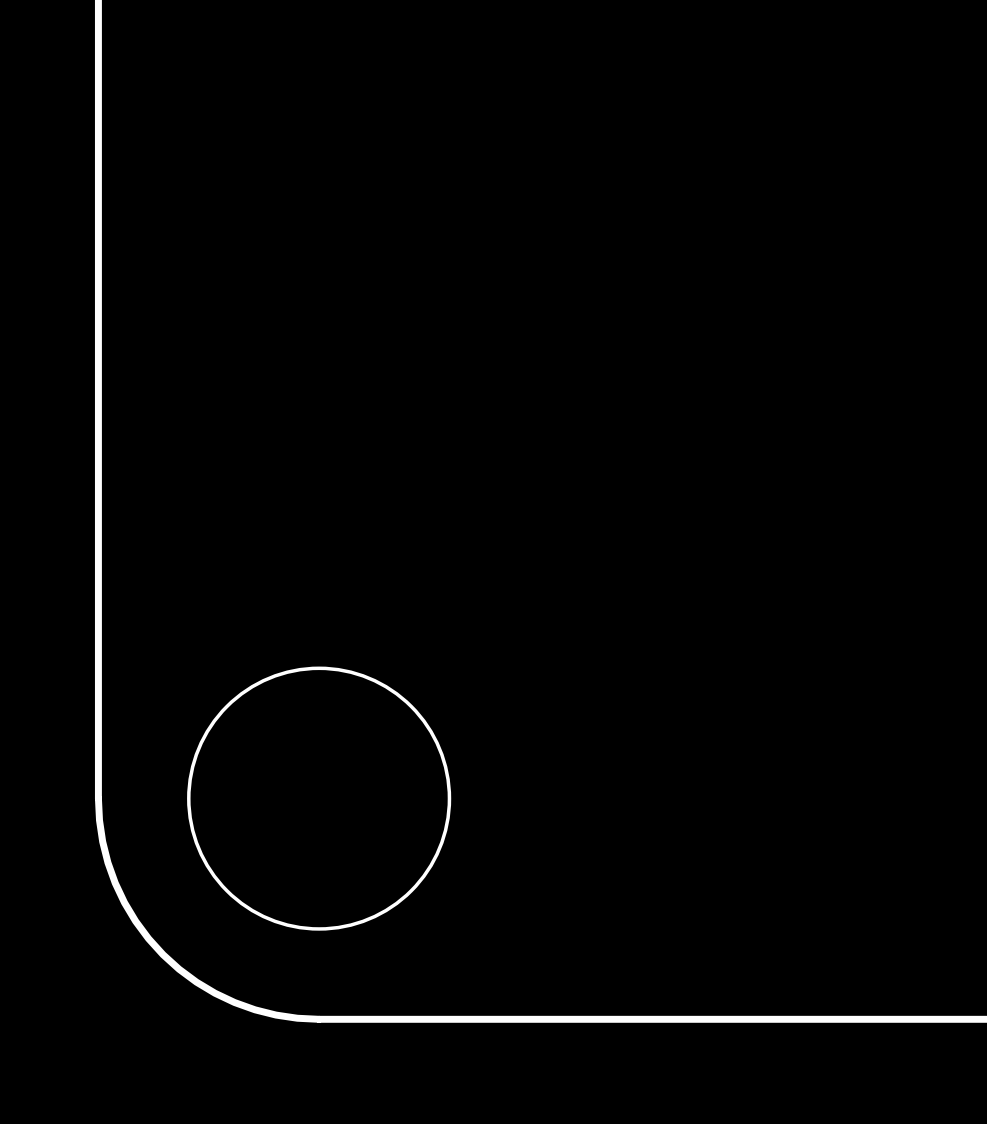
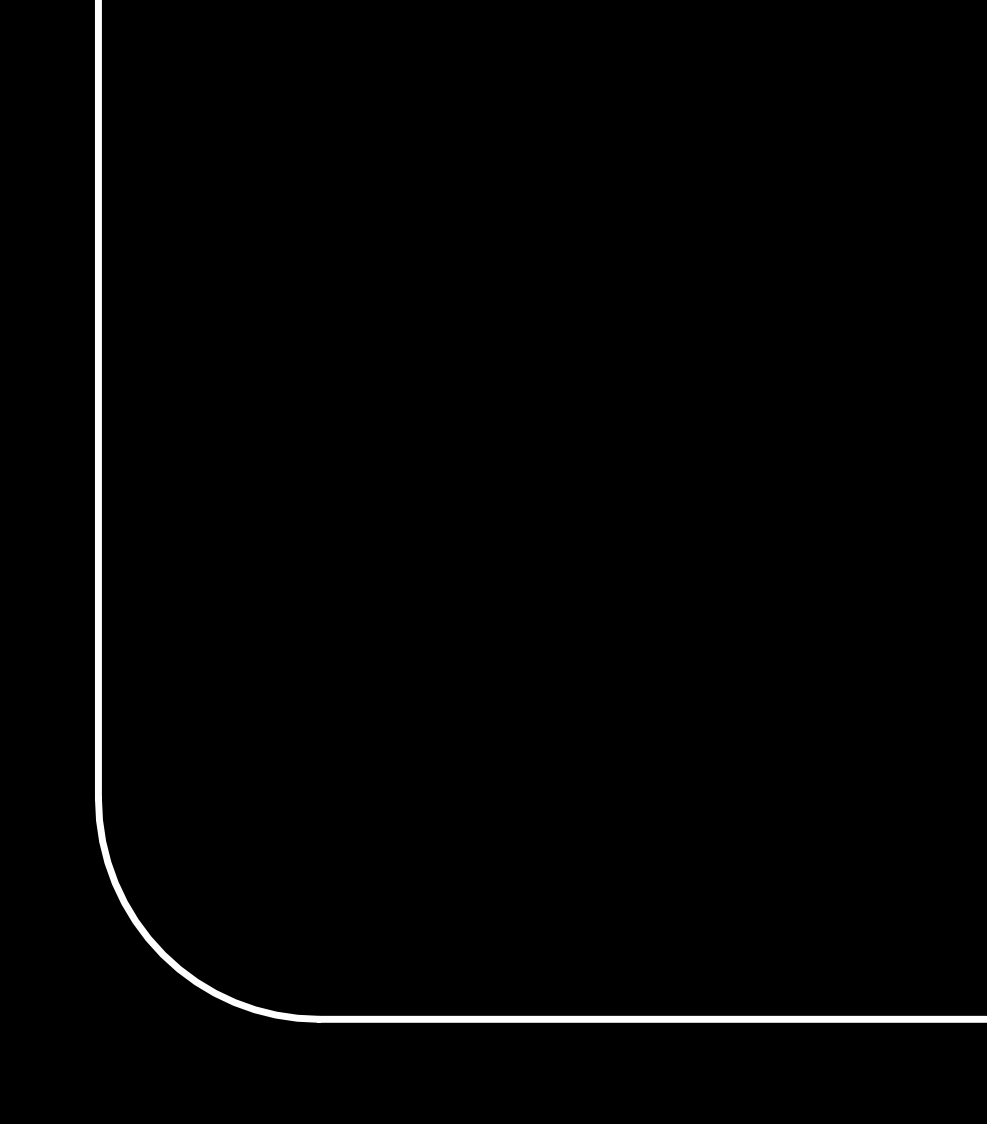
round board edge: [187, 666, 452, 931] -> none

